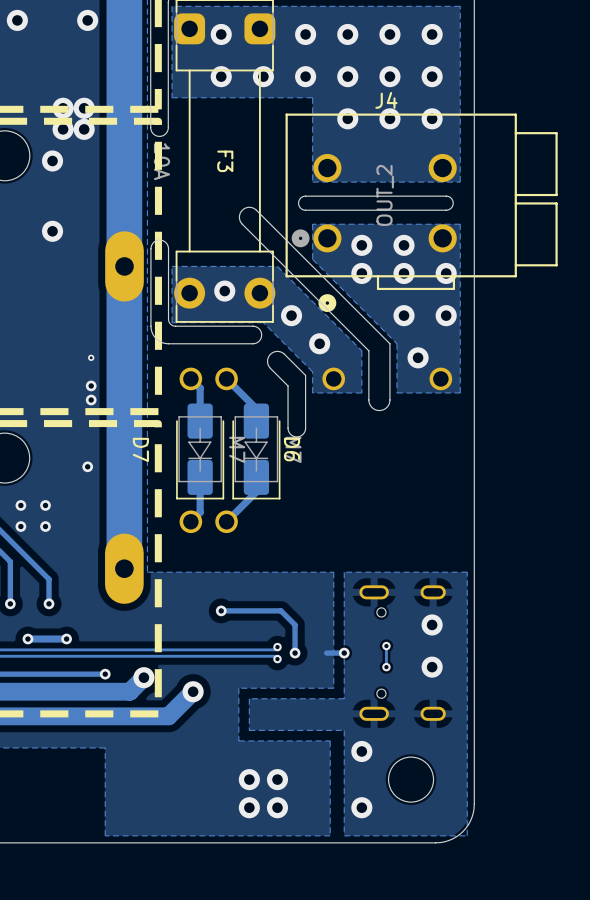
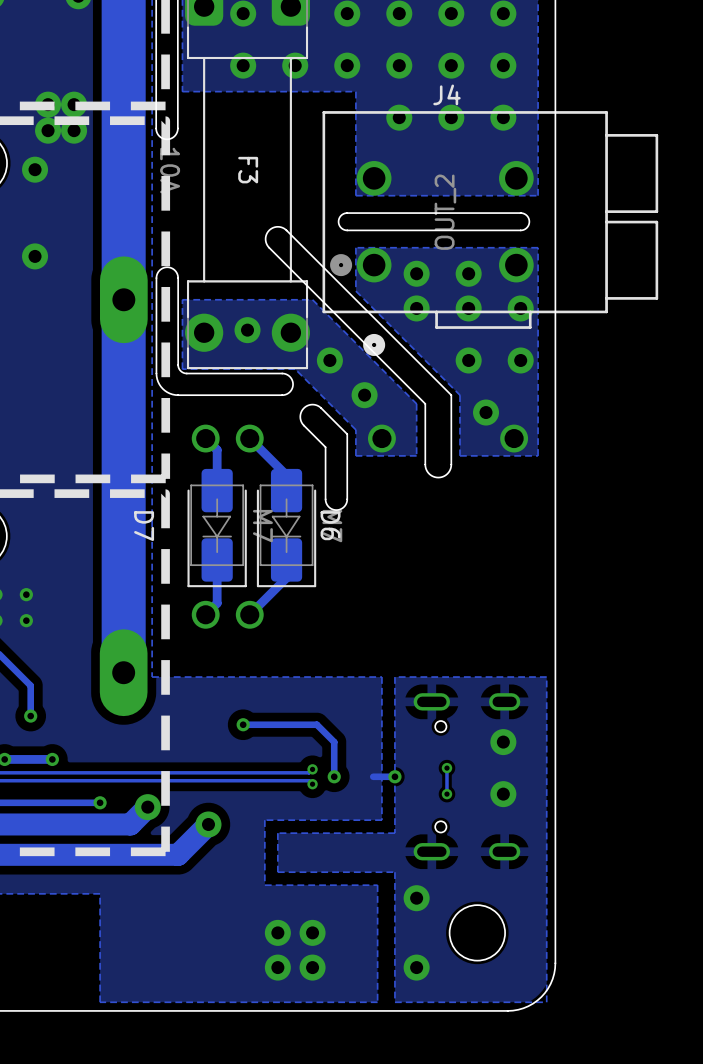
via: (91, 357) -> none
via: (91, 385) -> none
via: (91, 400) -> none
via: (87, 466) -> none

